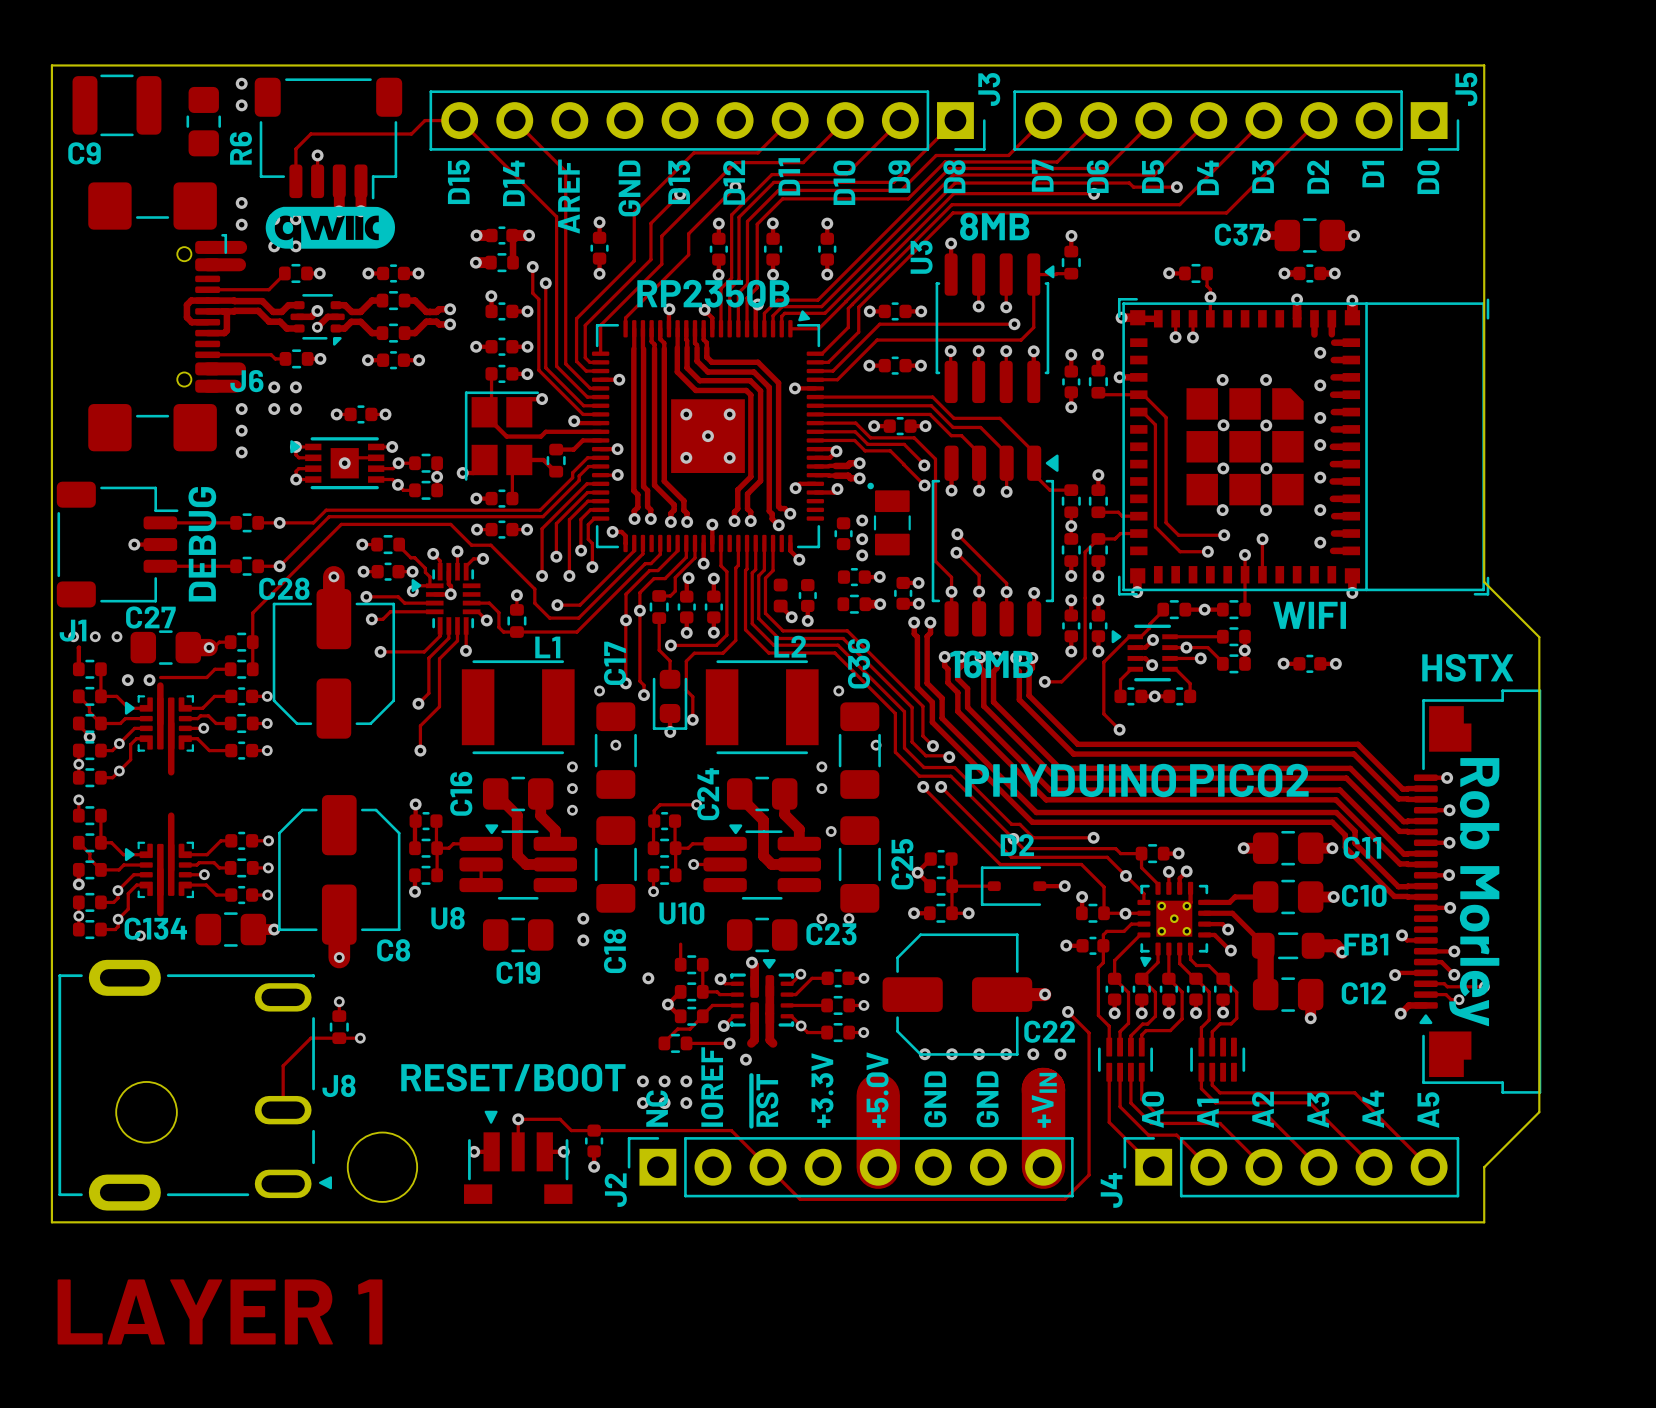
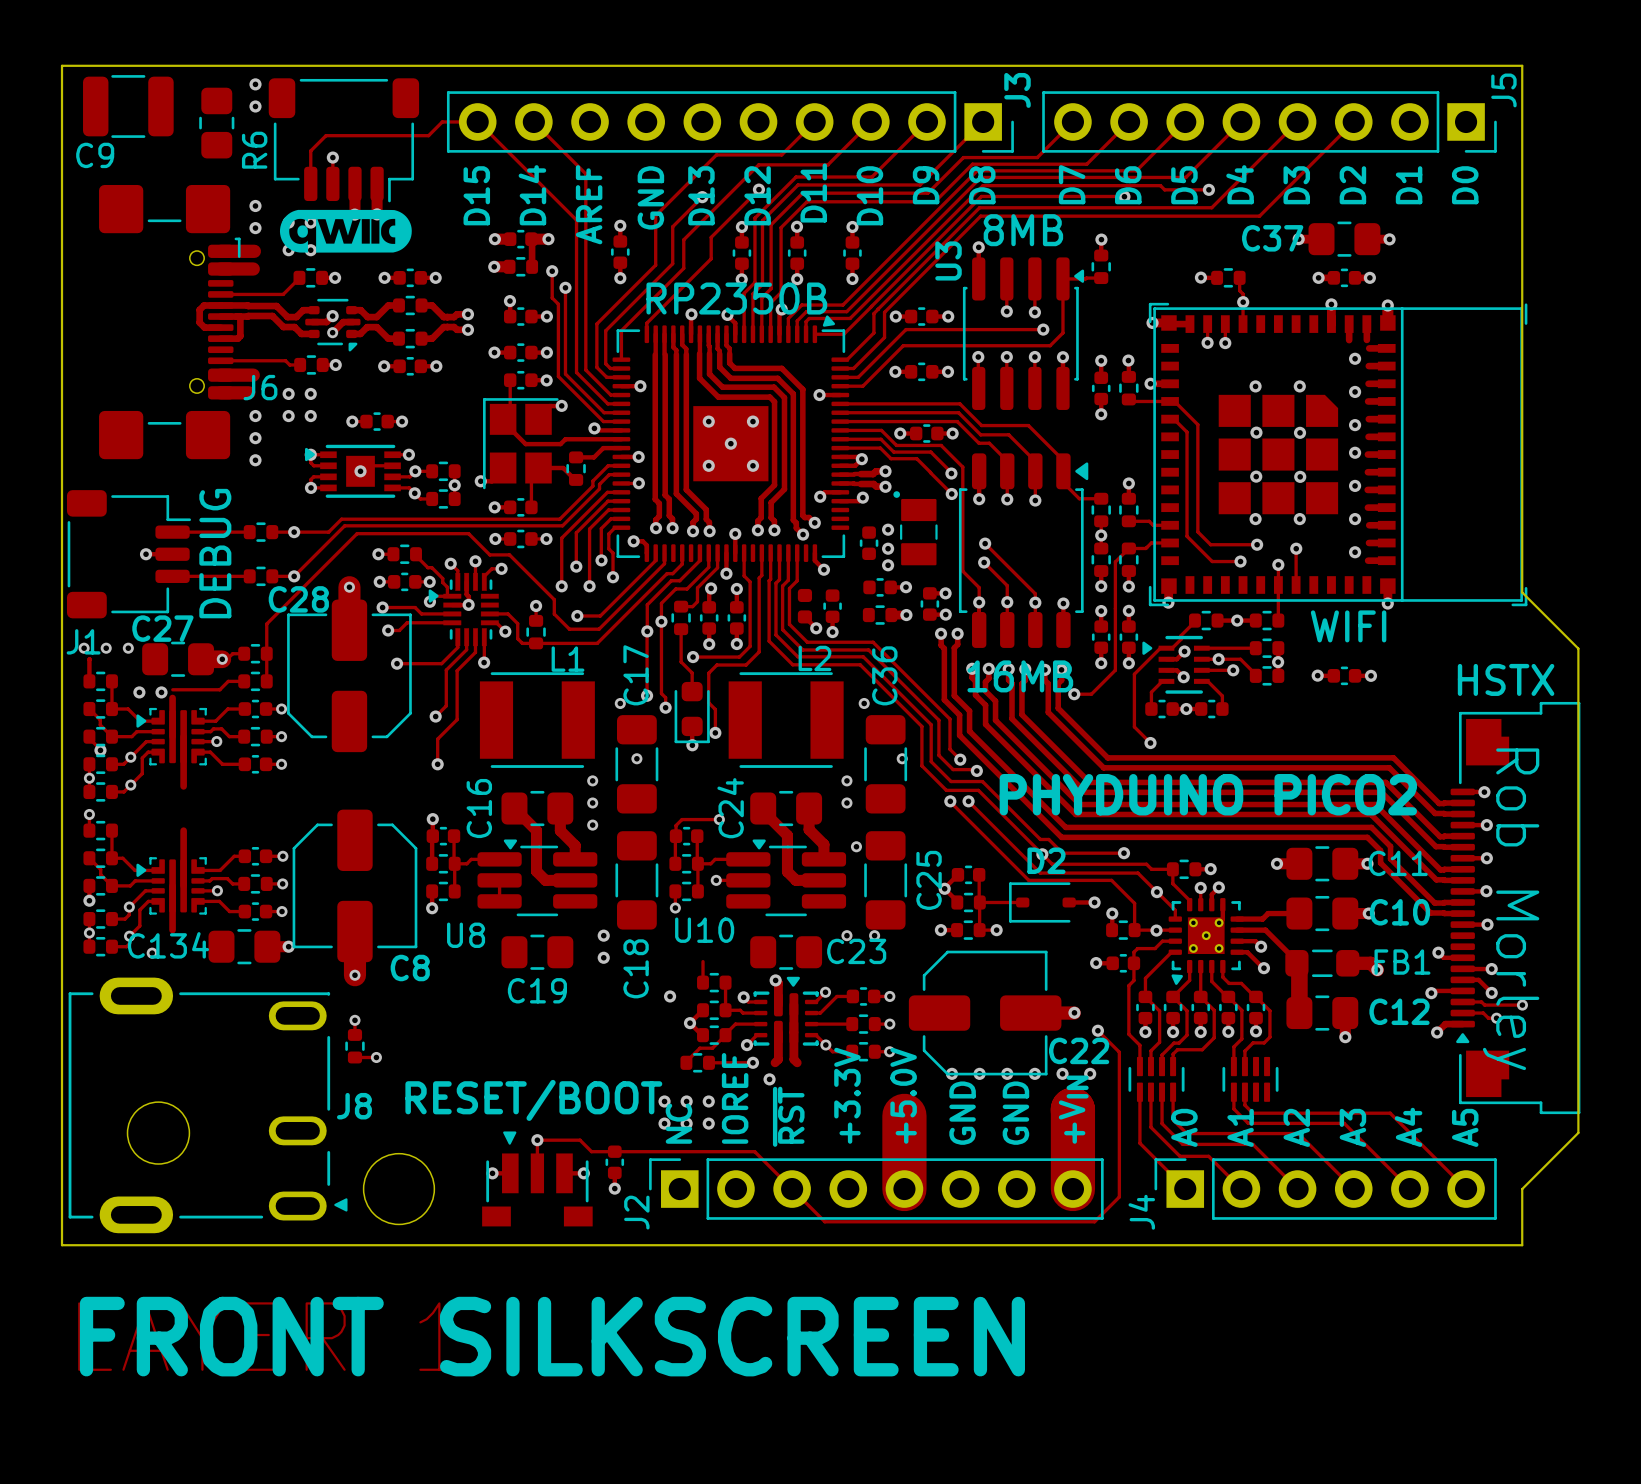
track: (339, 1038) (310, 1038) (283, 1065) (283, 1110) -> none
text: none -> FRONT SILKSCREEN (552, 1336)

